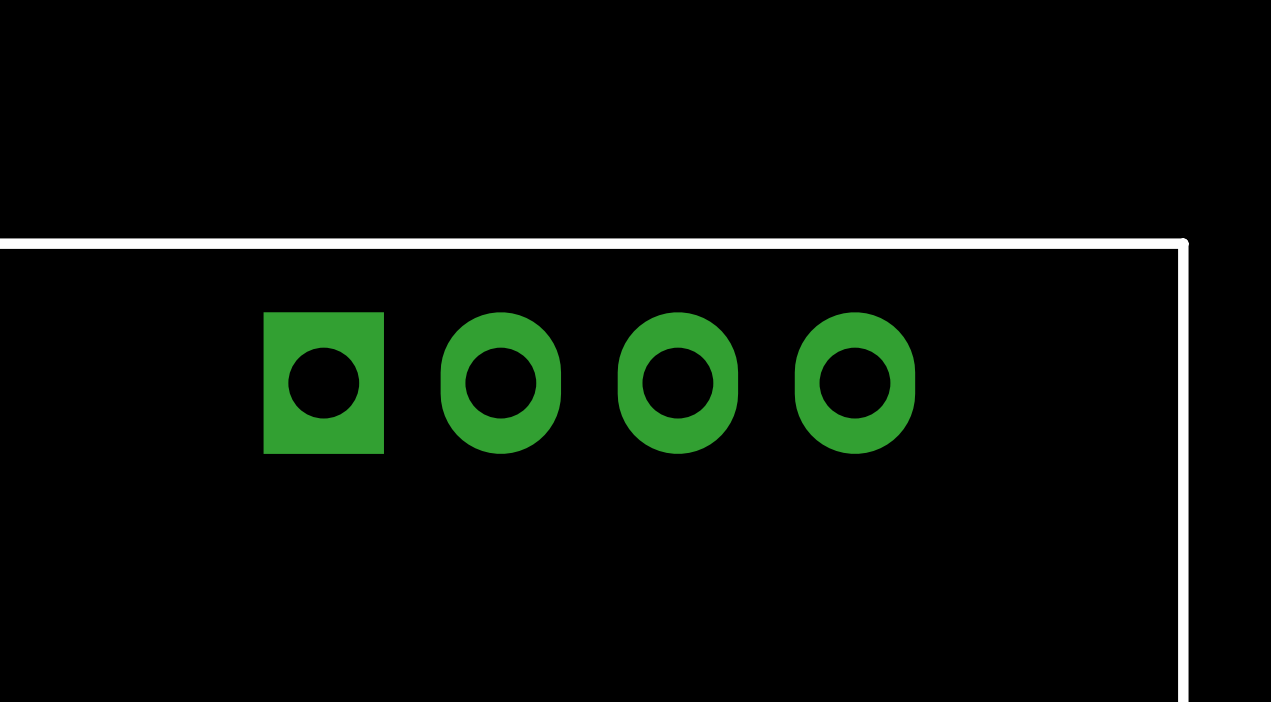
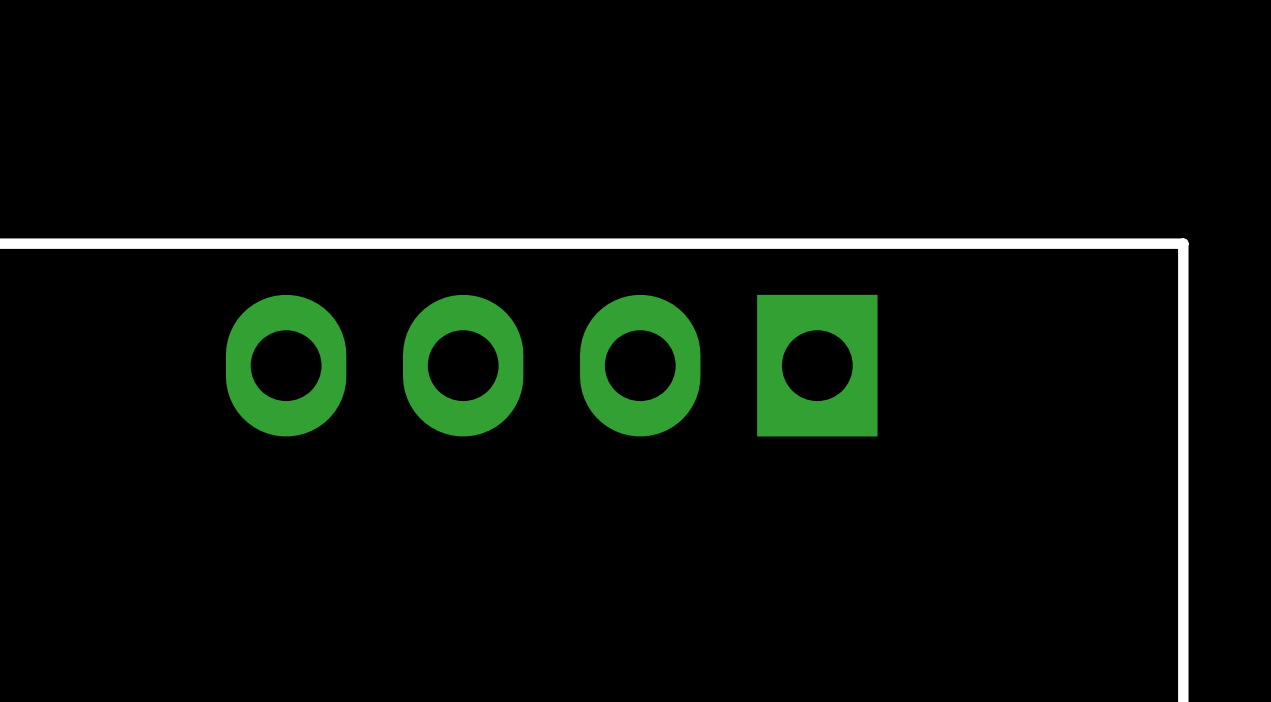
part rotation: 0° (589, 383) -> 180° (551, 365)

